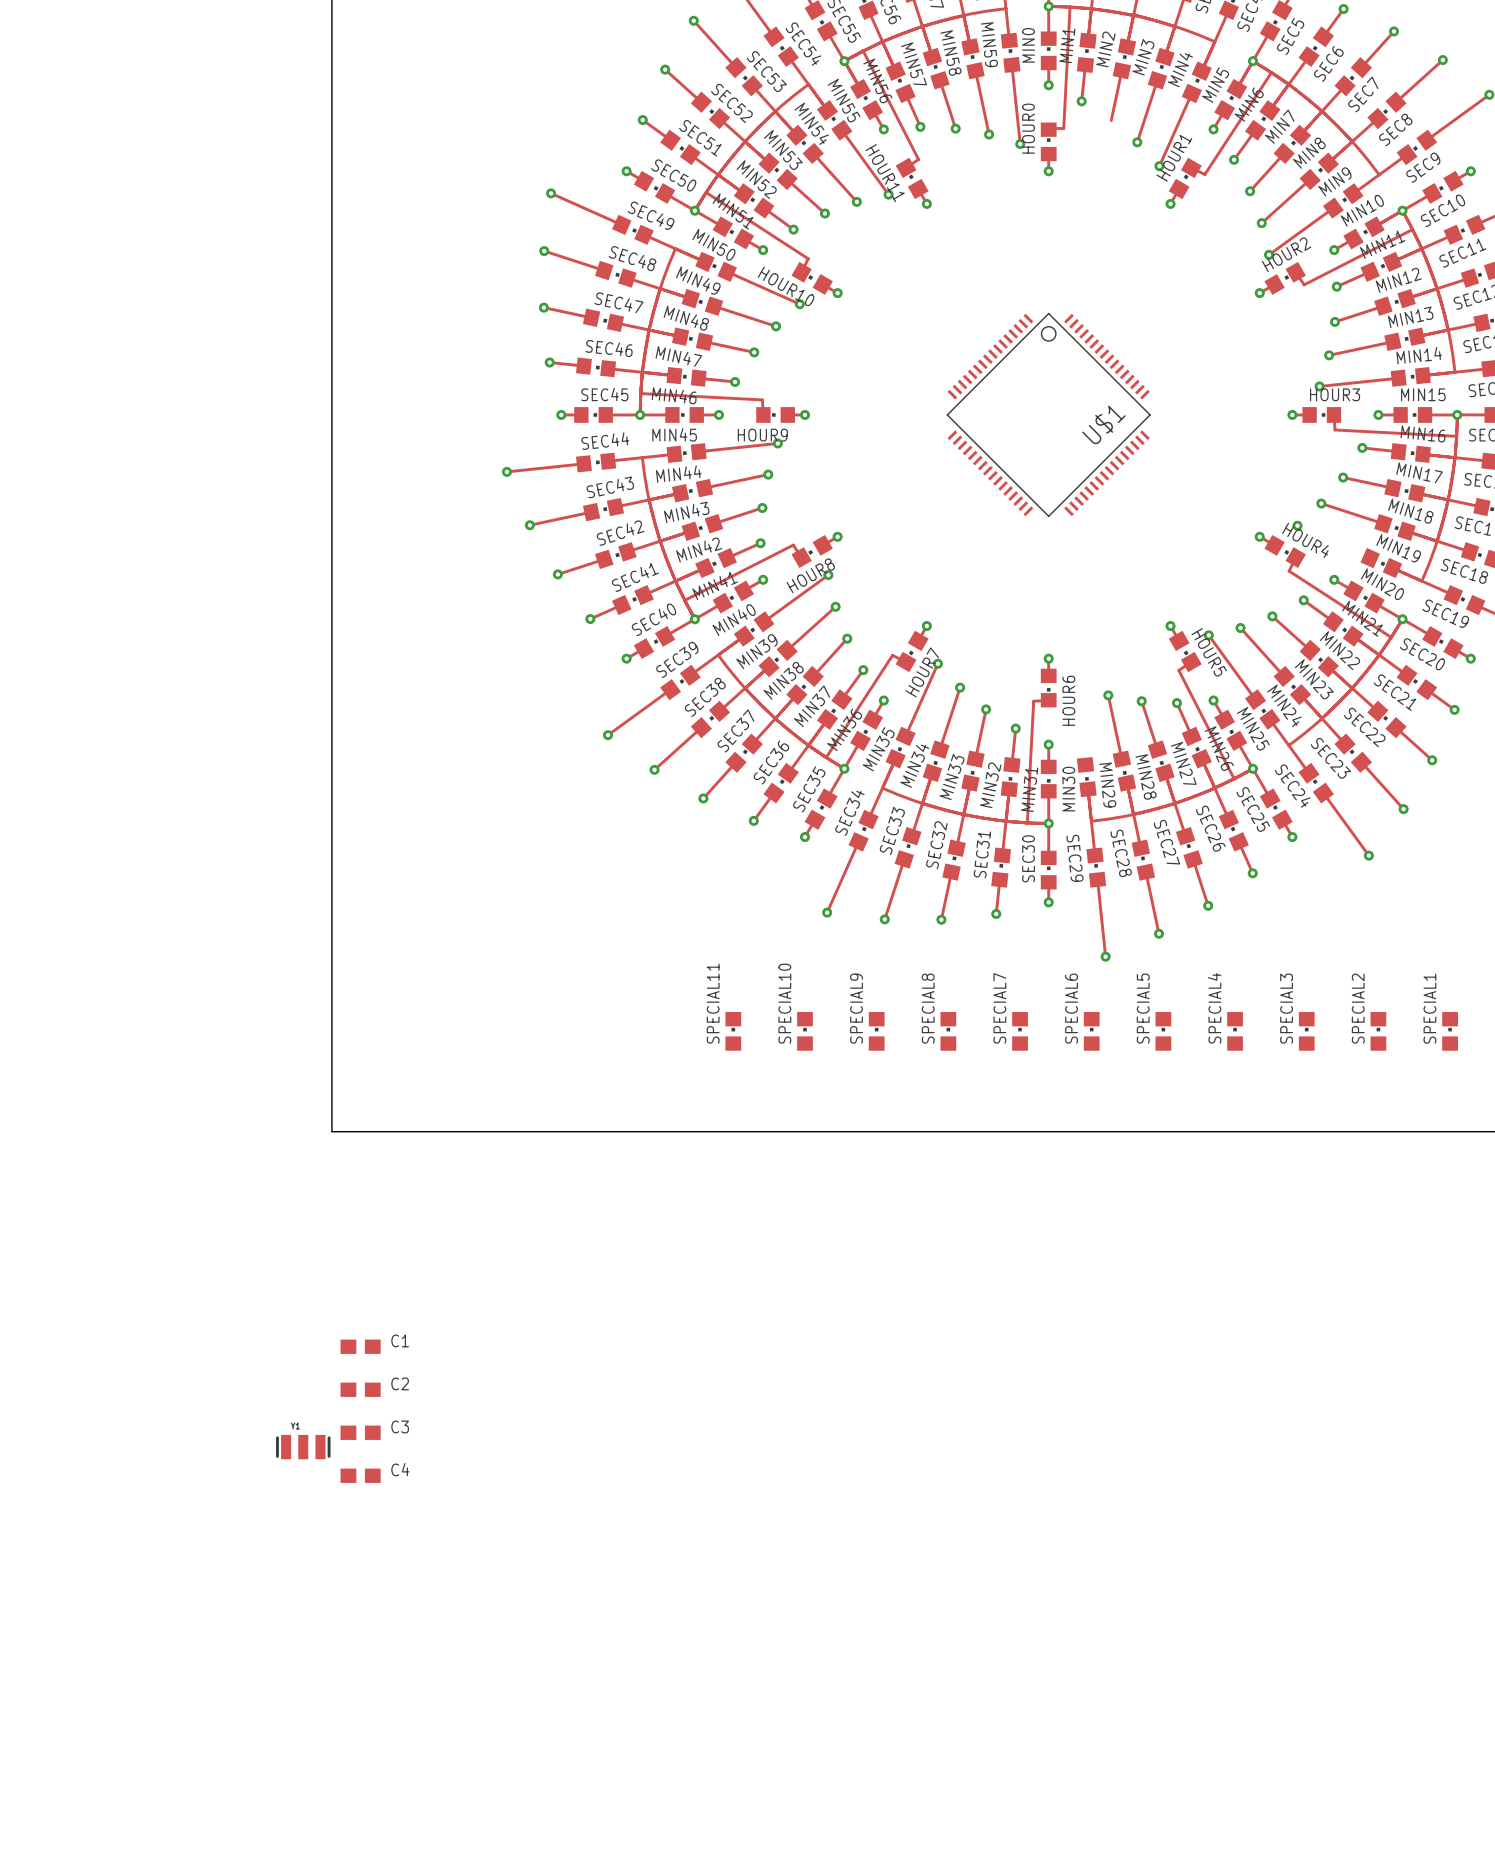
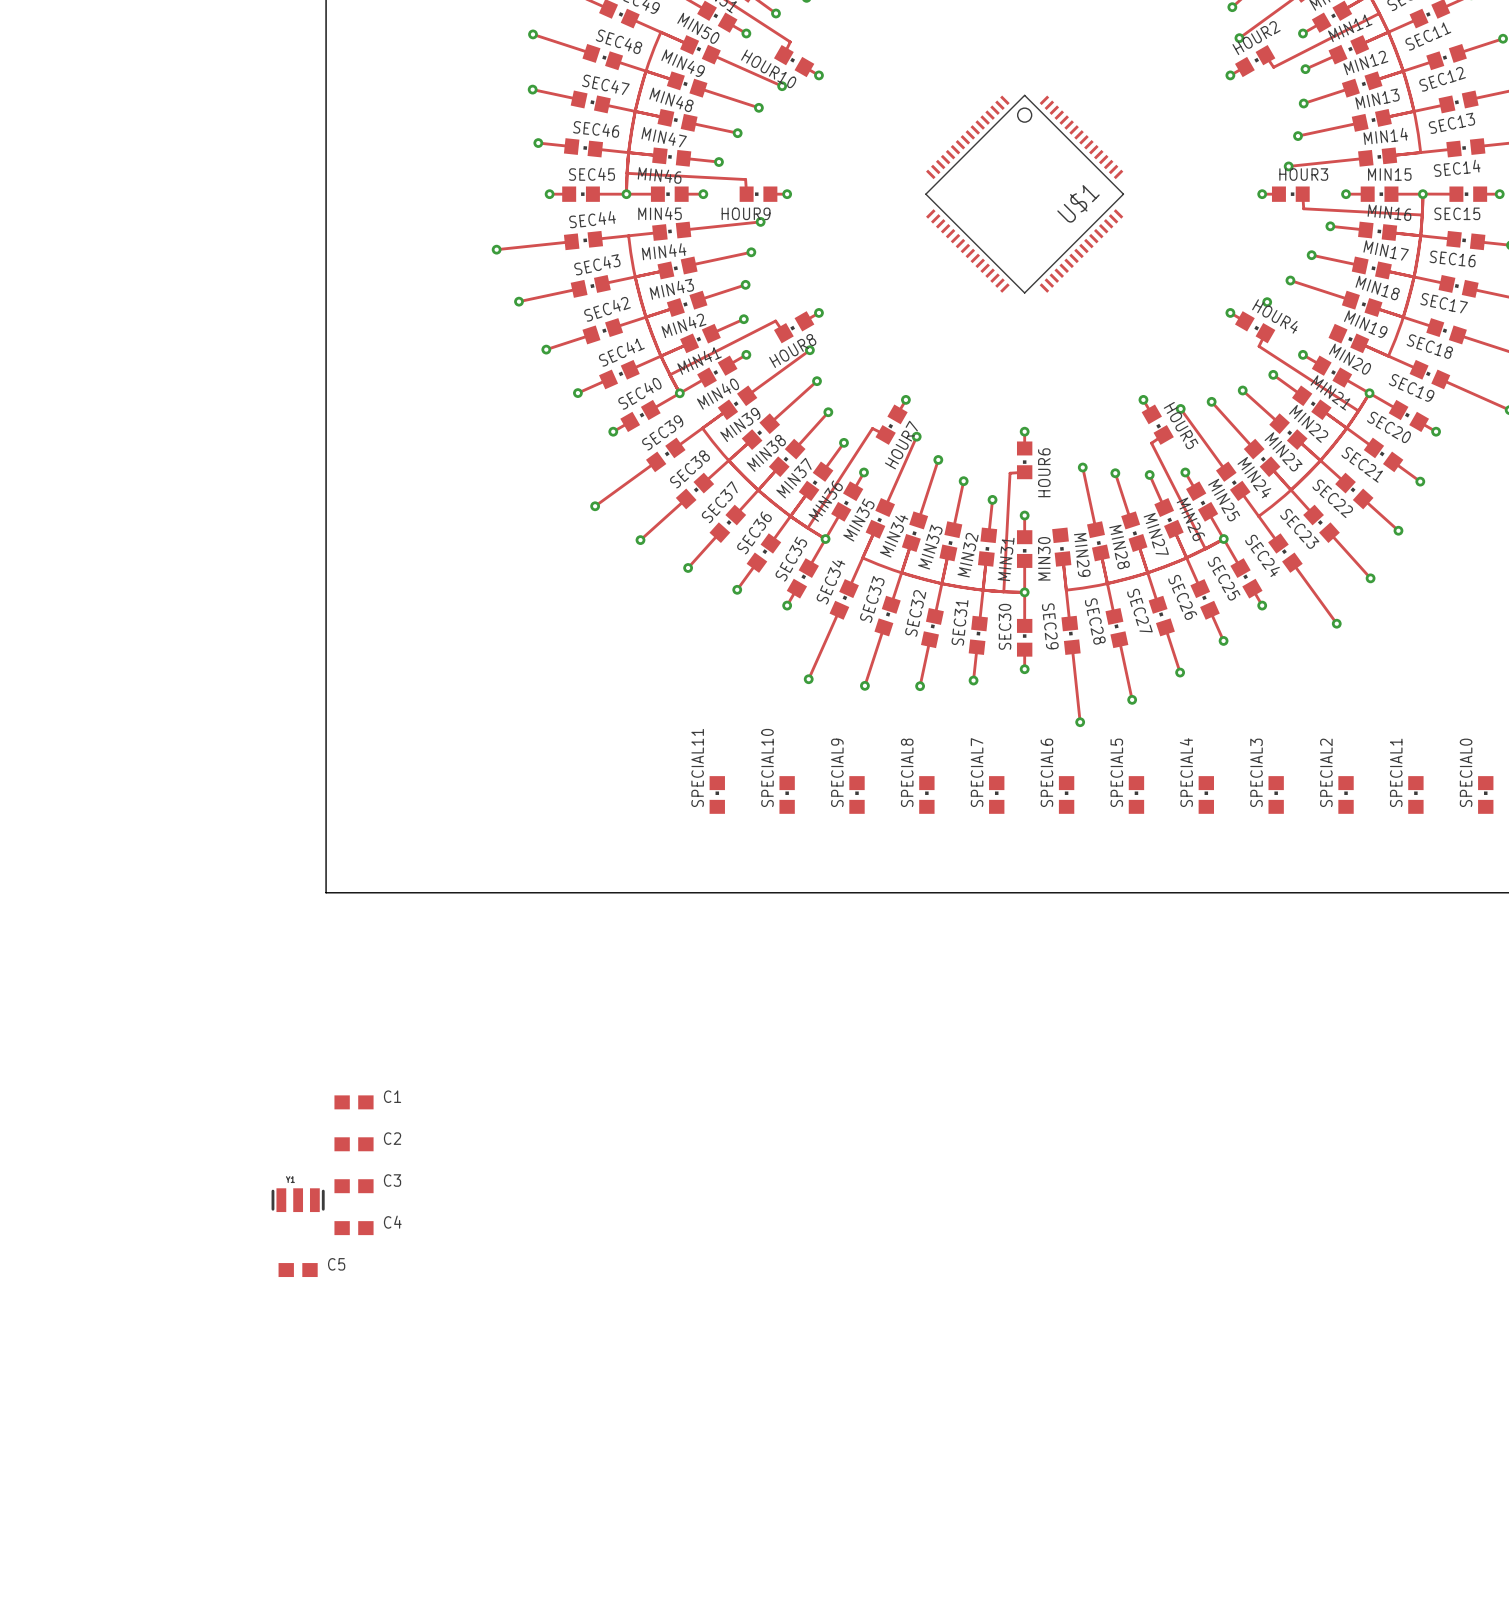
C5: none -> (298, 1270)

